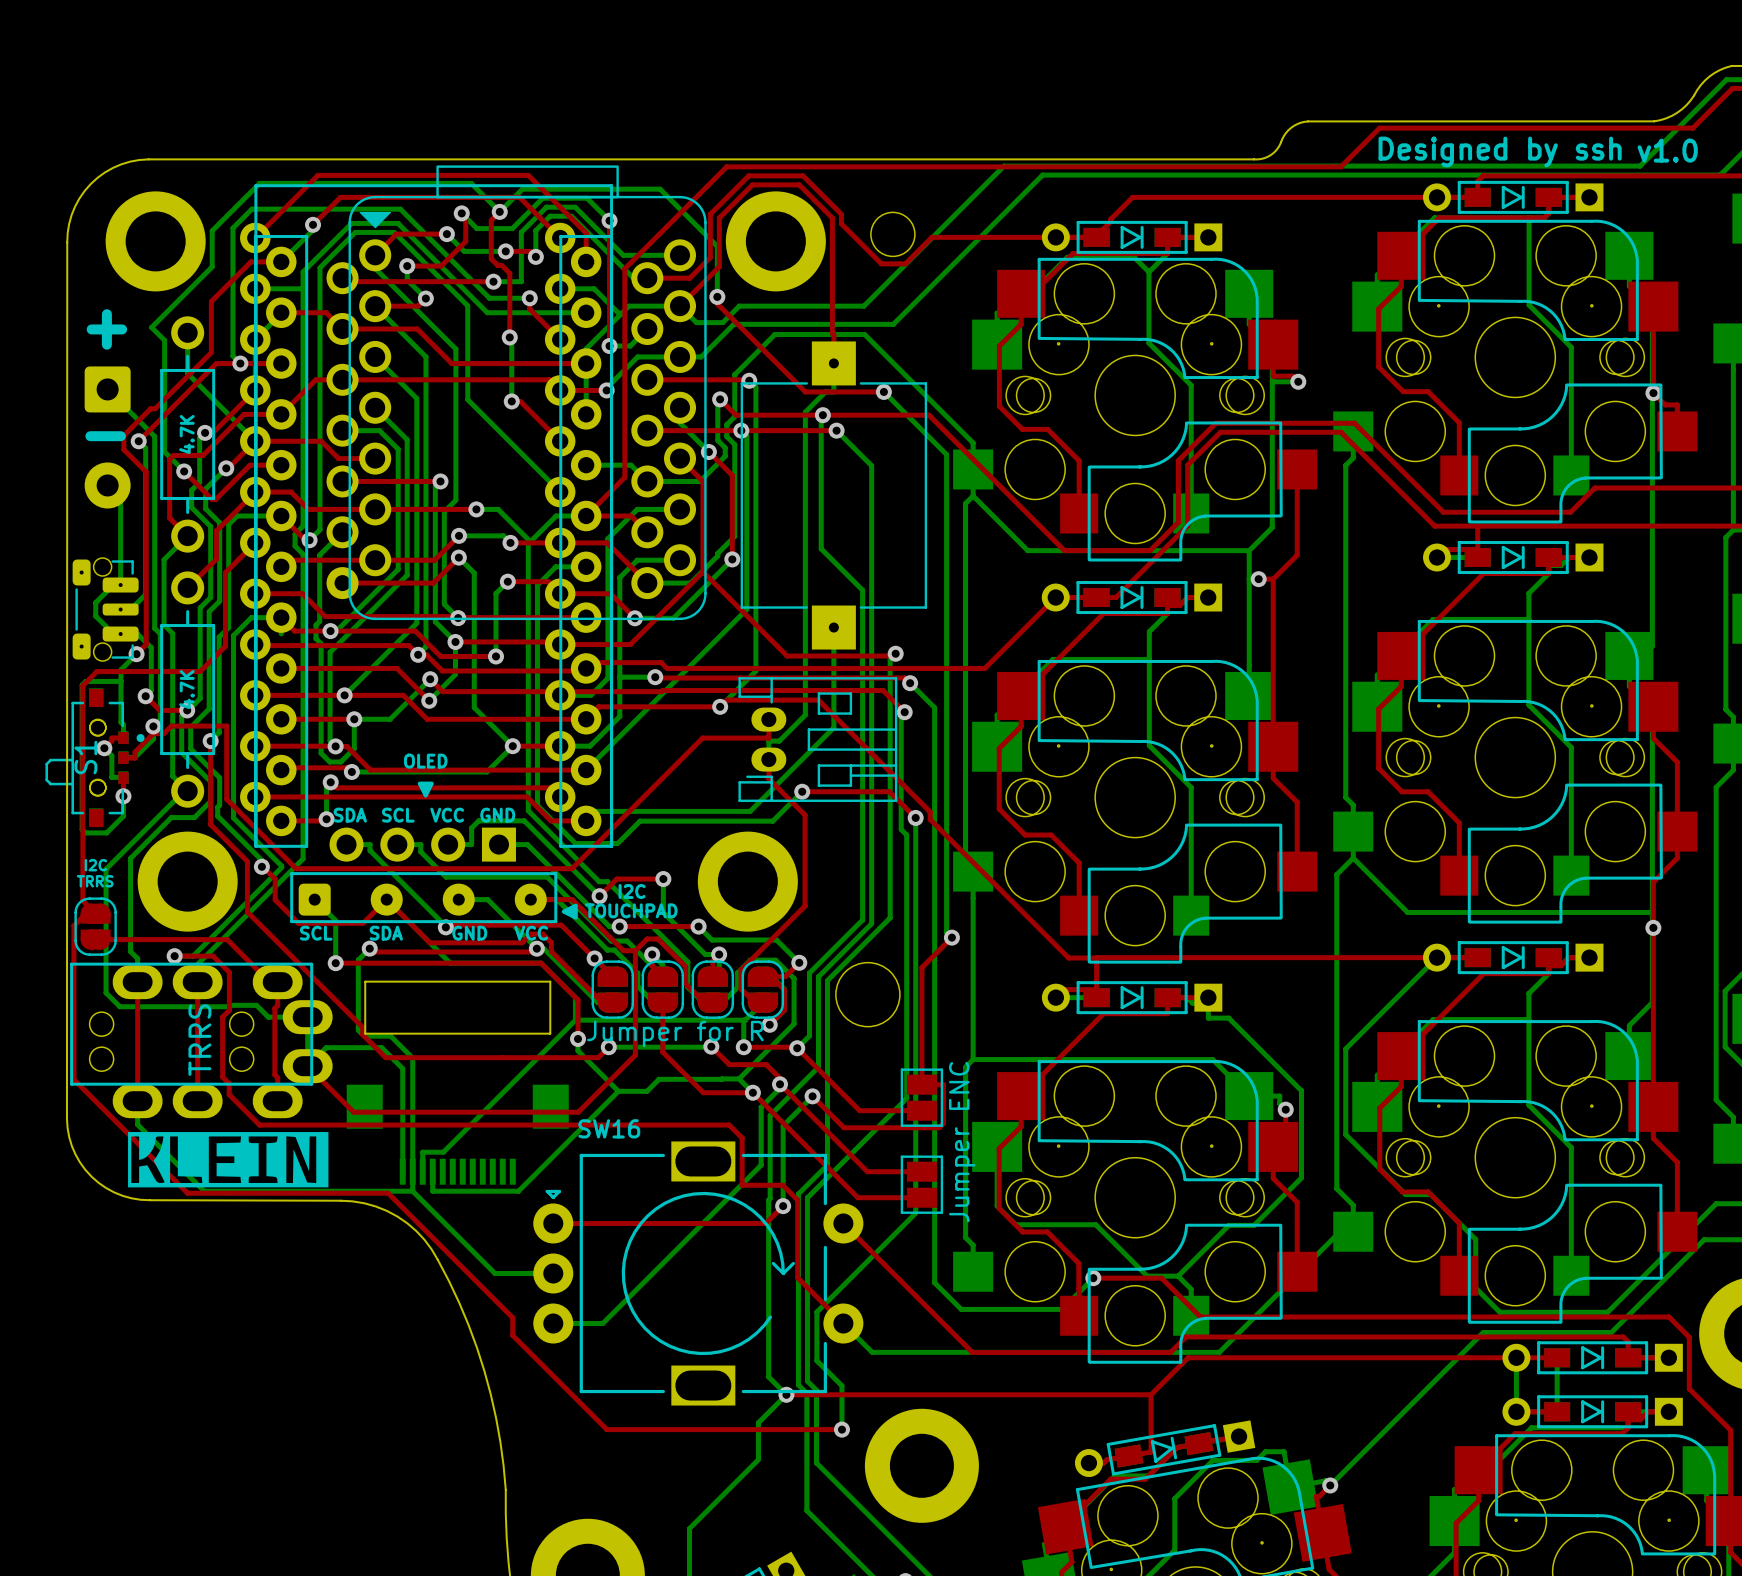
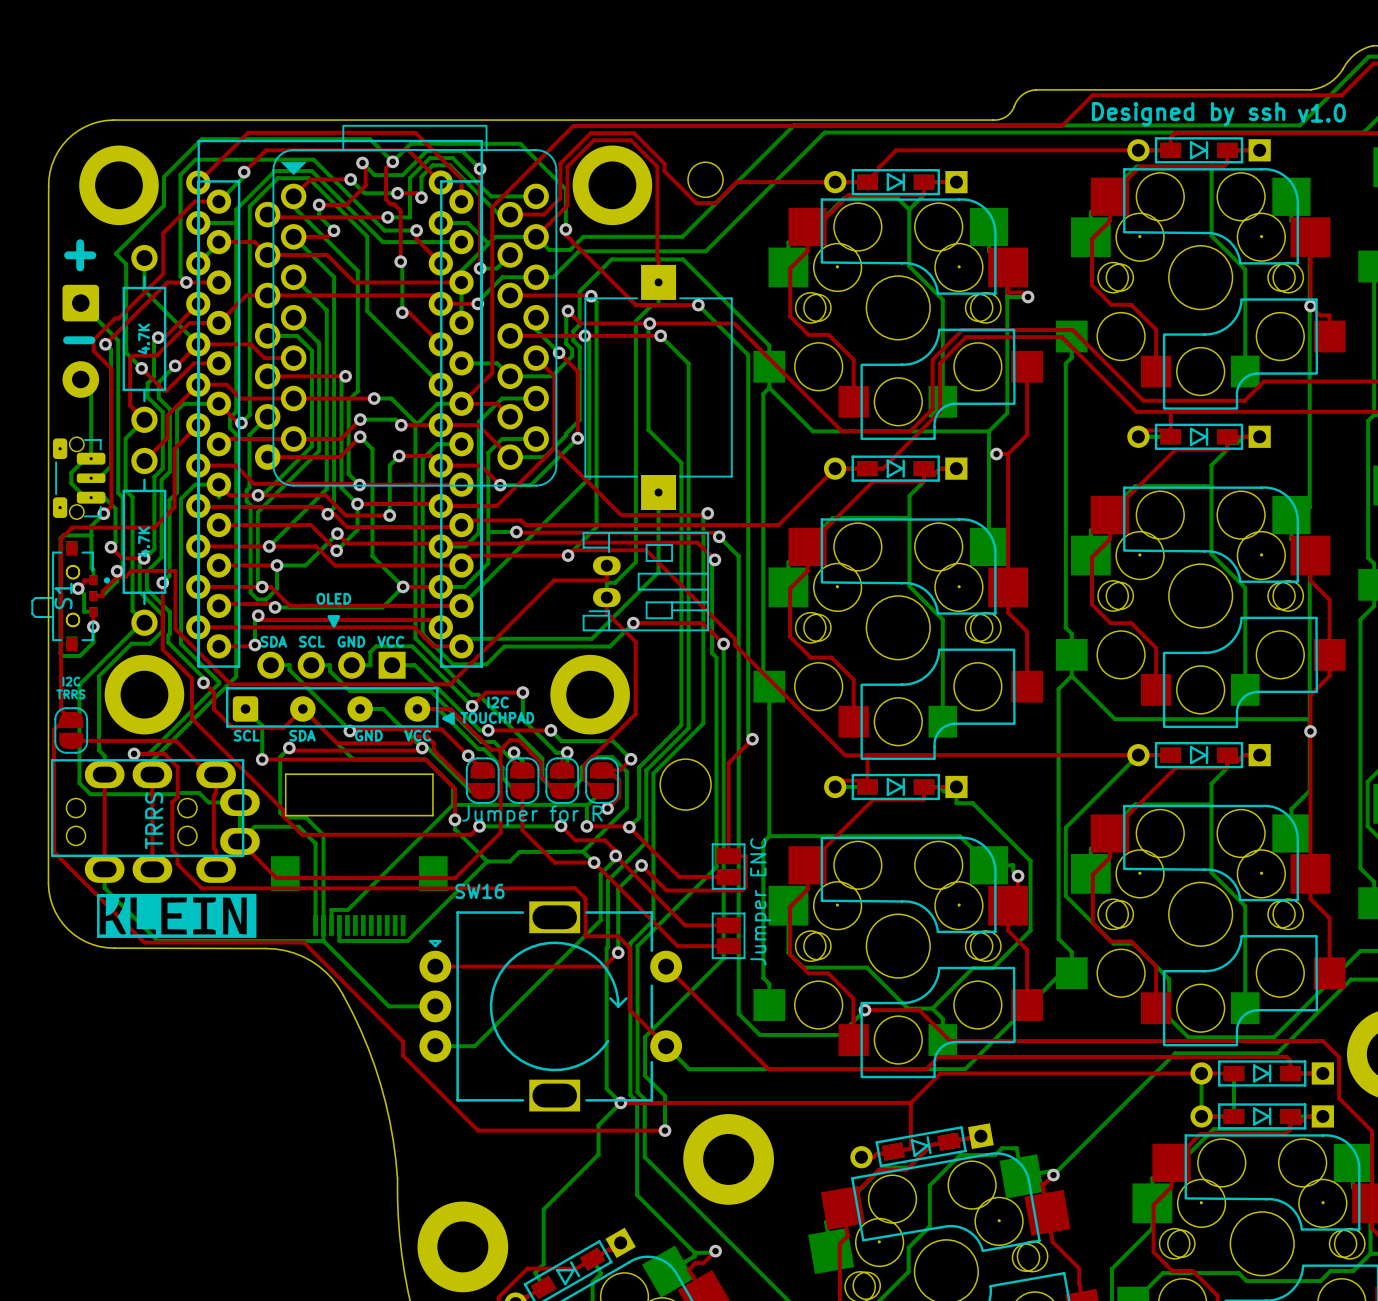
text: VCC (447, 815) -> GND (351, 641)
text: GND (497, 815) -> VCC (390, 641)

